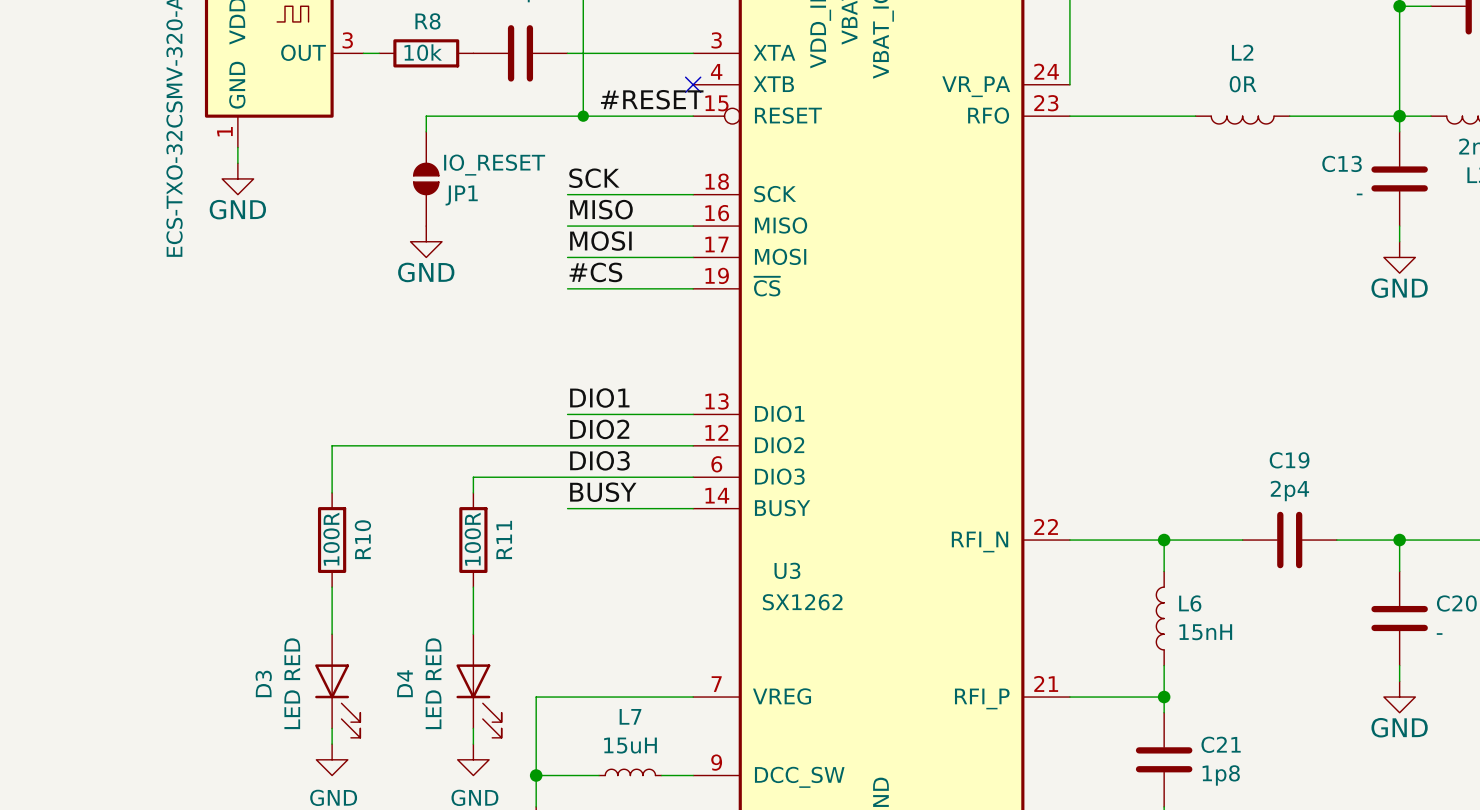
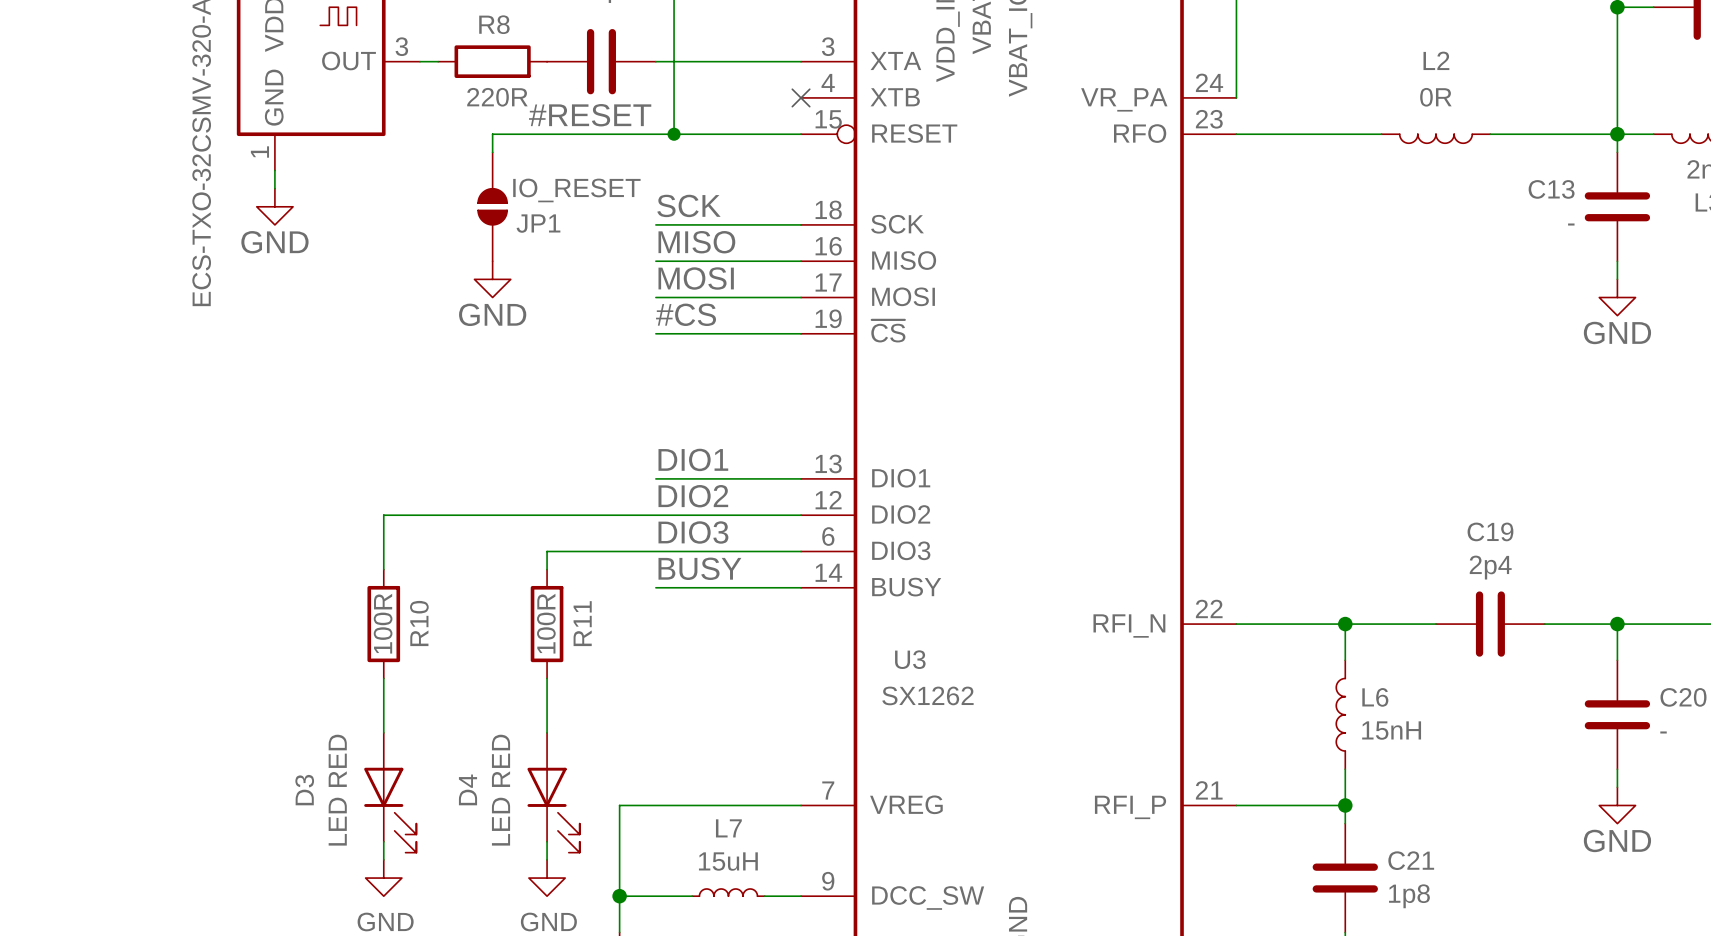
R8 value: 10k (423, 52) -> 220R (497, 97)
label position: #RESET (652, 99) -> #RESET (590, 115)

